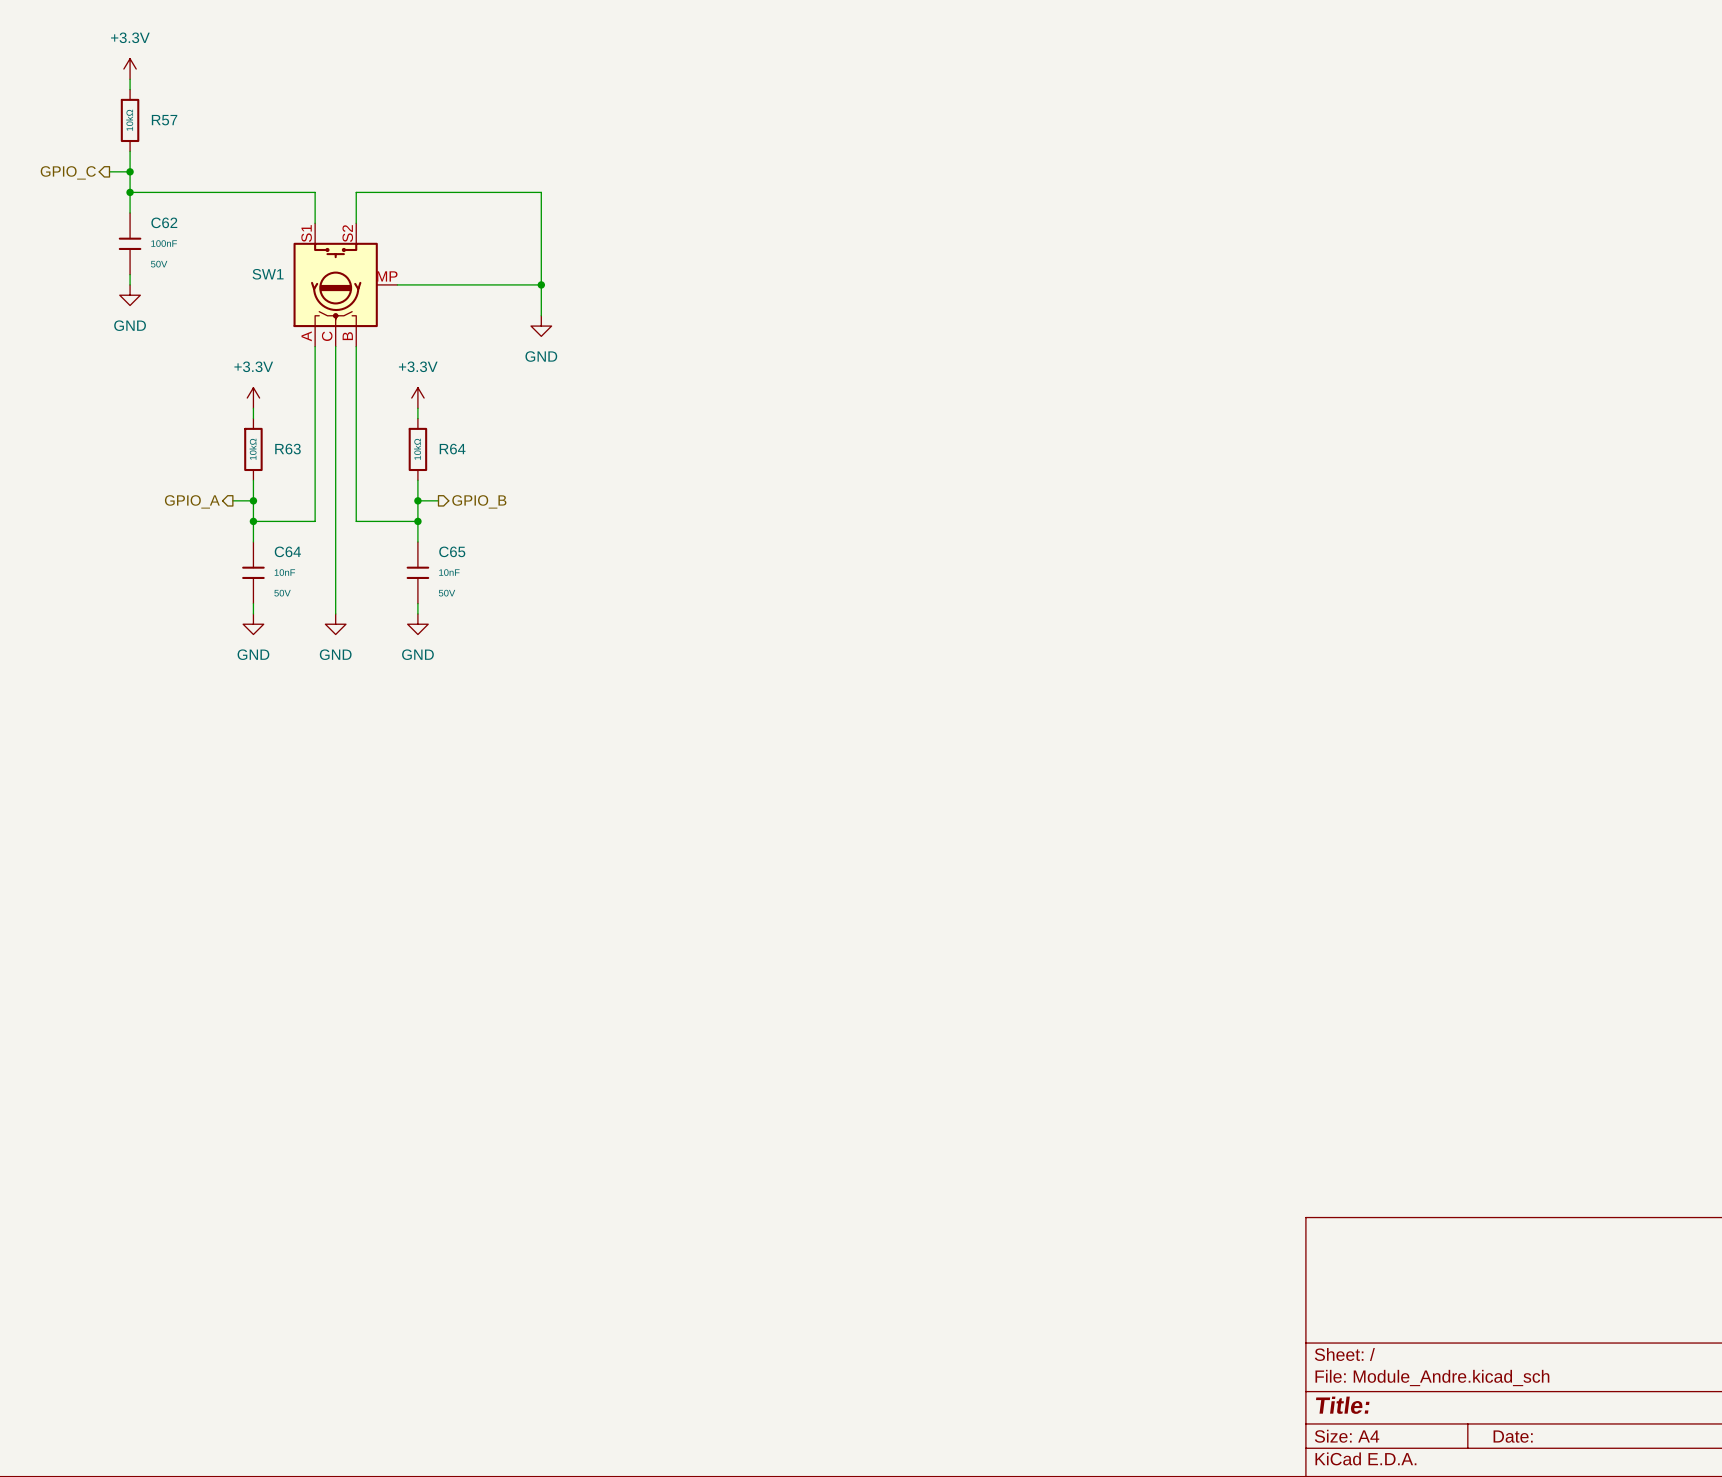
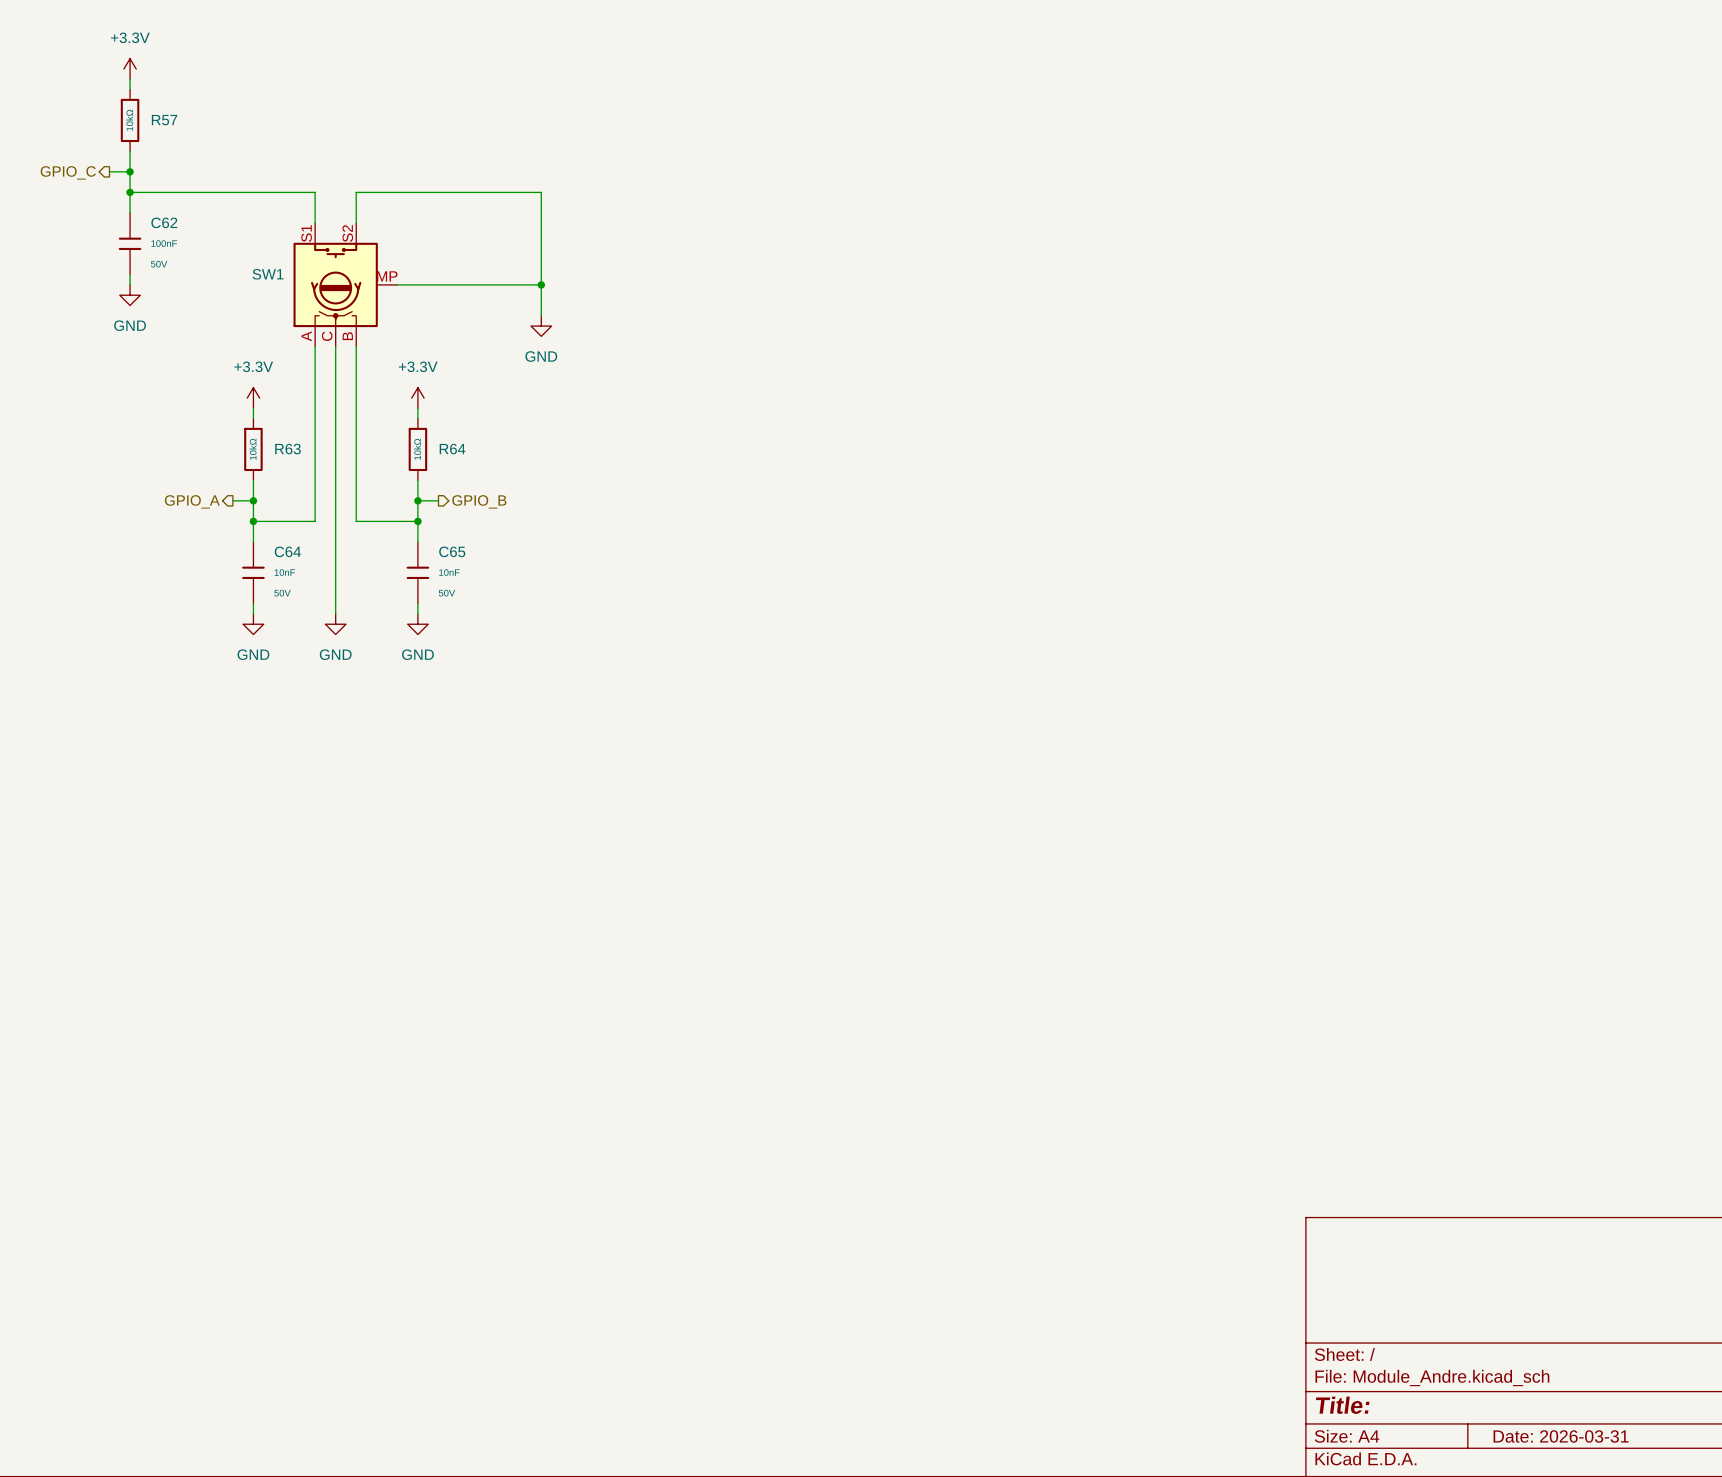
title block: Date: (1513, 1436) -> Date: 2026-03-31 (1561, 1436)

